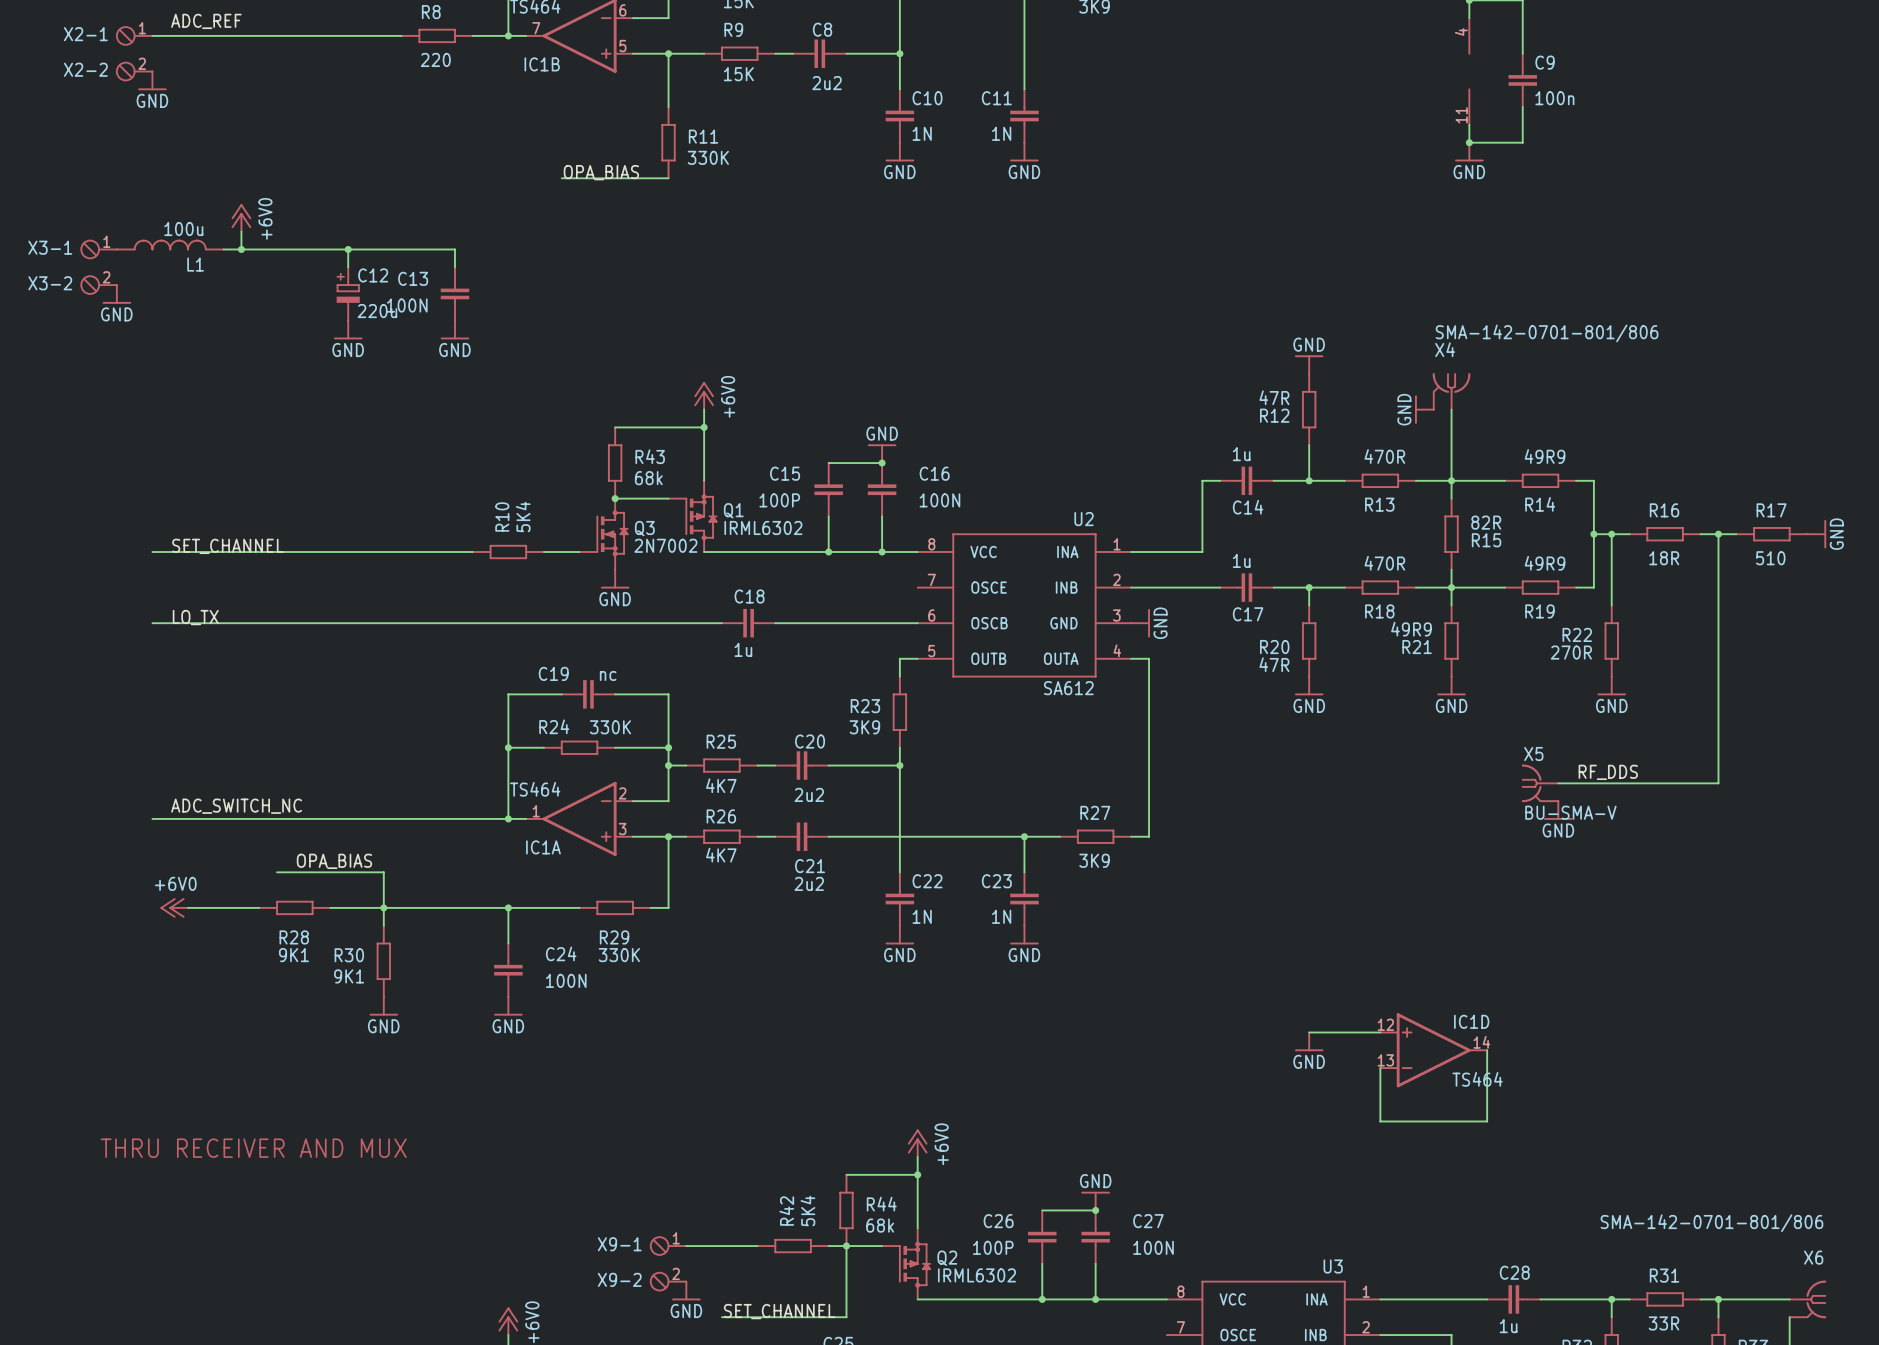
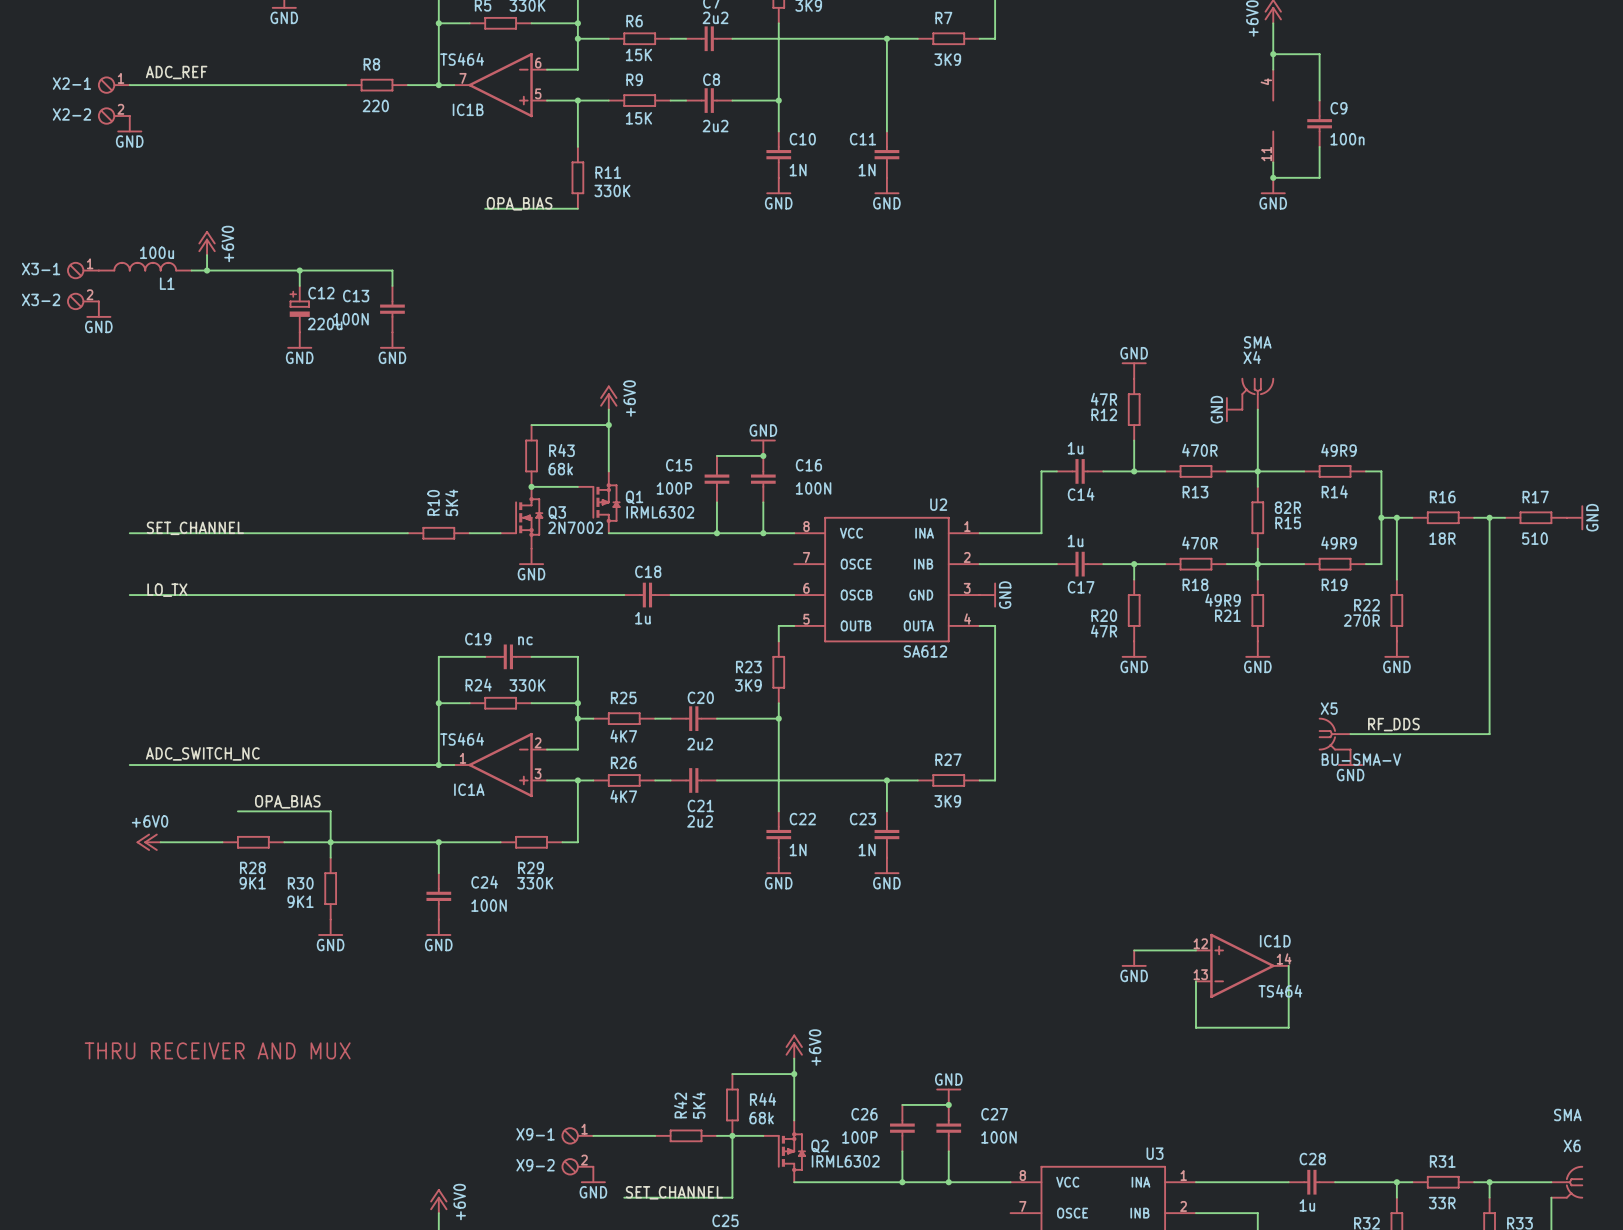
X4 value: SMA-142-0701-801/806 (1547, 333) -> SMA (1257, 342)
X6 value: SMA-142-0701-801/806 (1711, 1223) -> SMA (1567, 1115)

